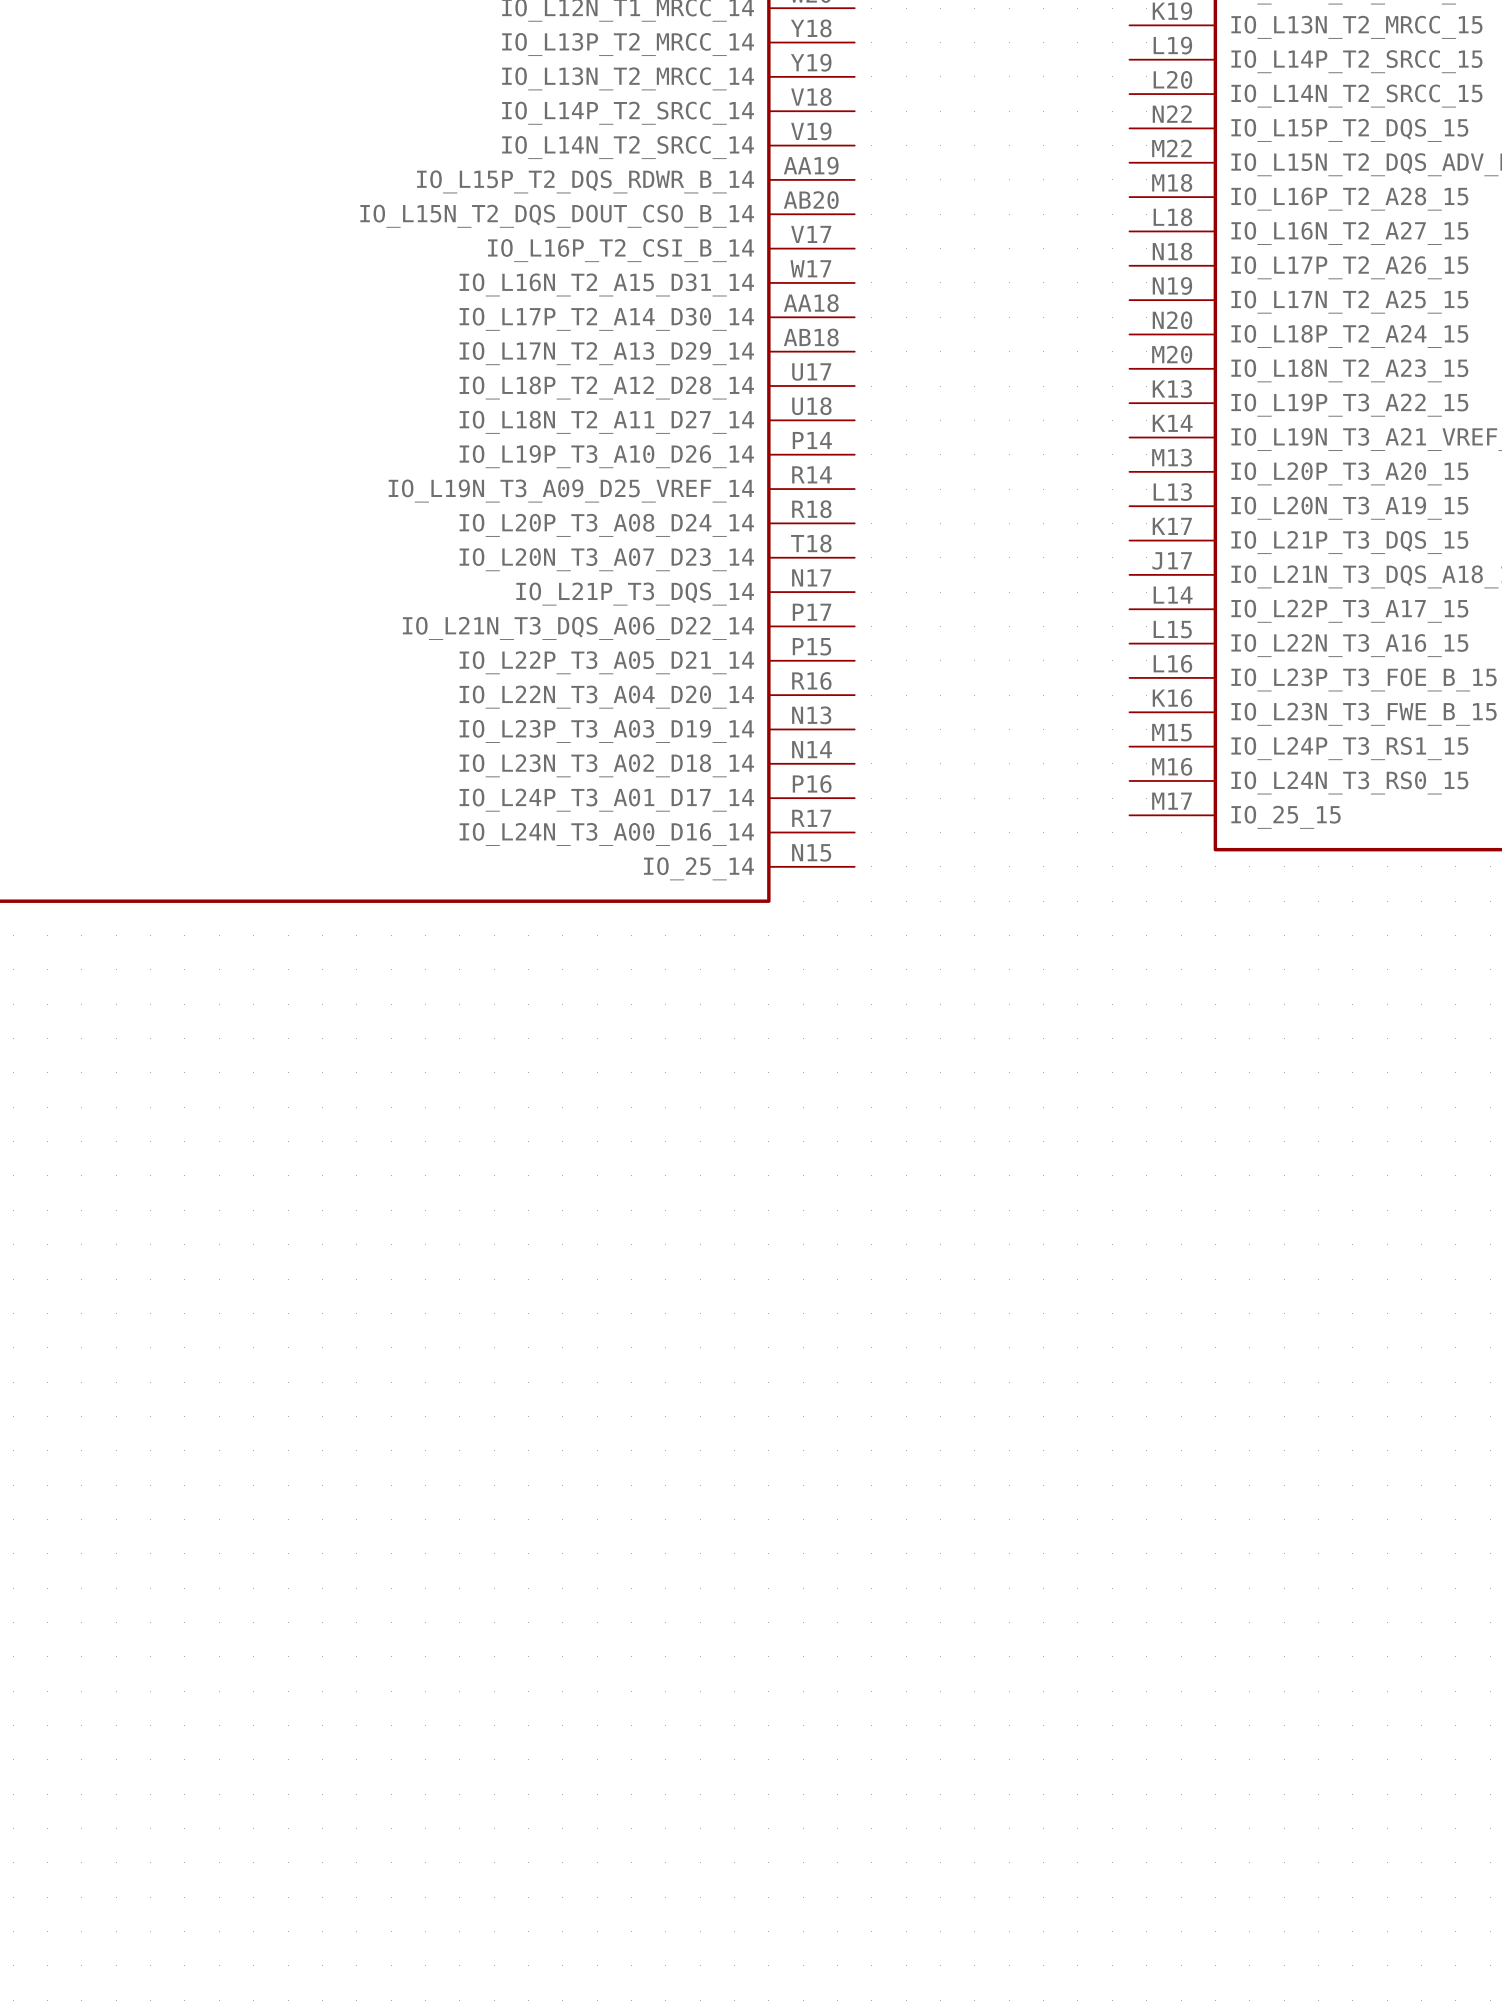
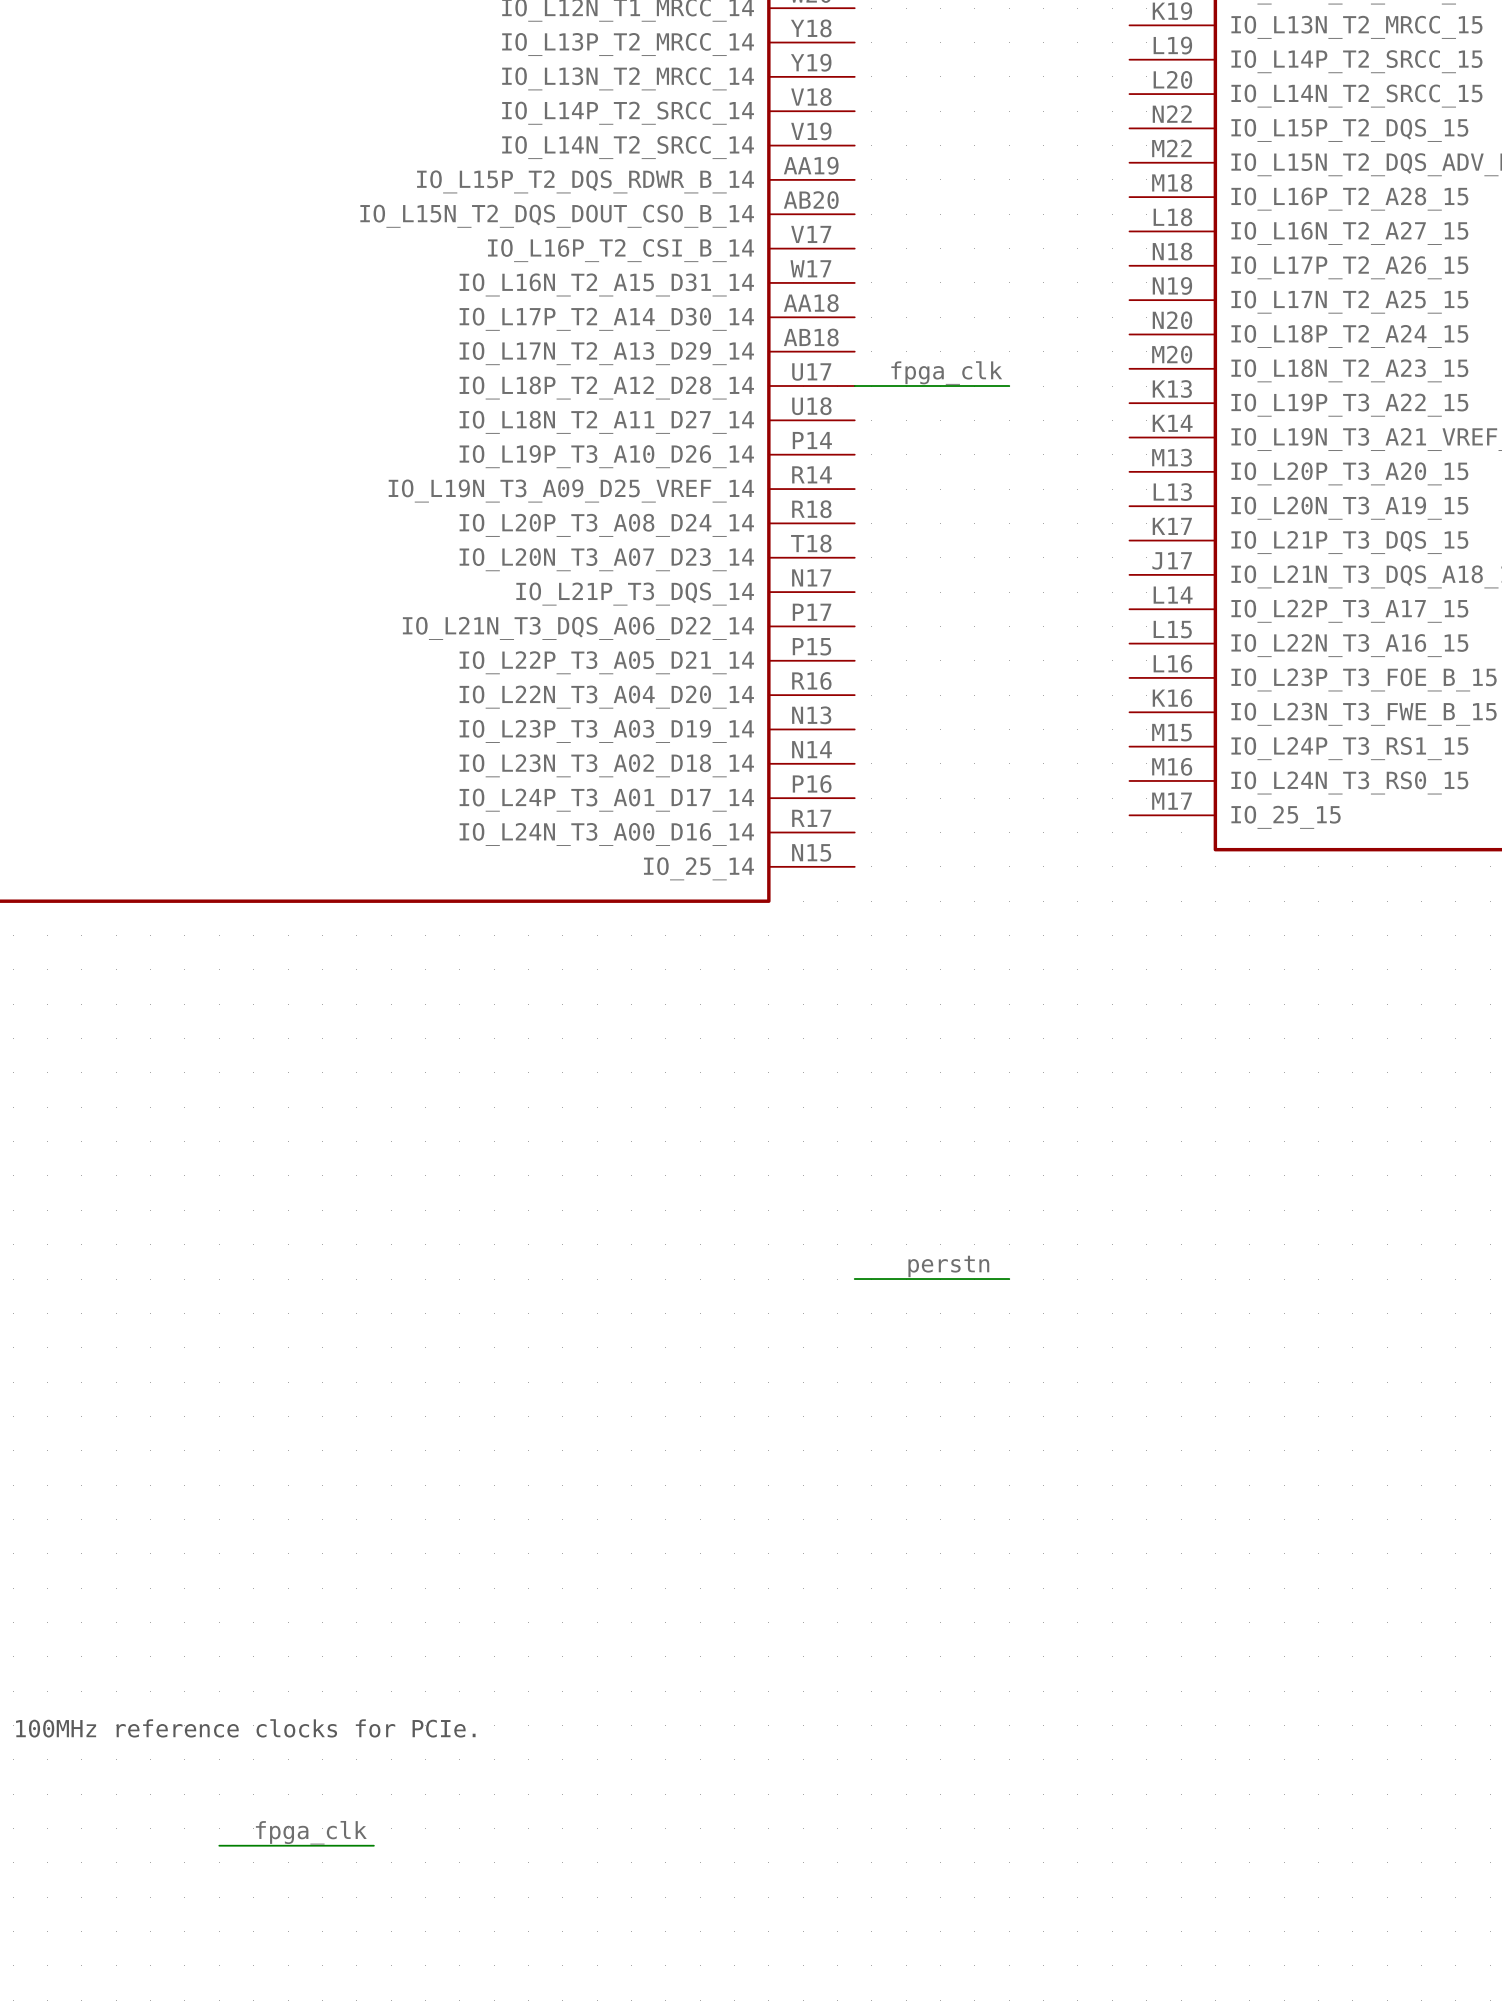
label: none -> fpga_clk (946, 373)
wire: none -> (854, 386) (1009, 386)
label: none -> perstn (948, 1266)
wire: none -> (854, 1279) (1009, 1279)
text: none -> 100MHz reference clocks for PCIe. (245, 1728)
label: none -> fpga_clk (311, 1832)
wire: none -> (219, 1845) (373, 1845)

